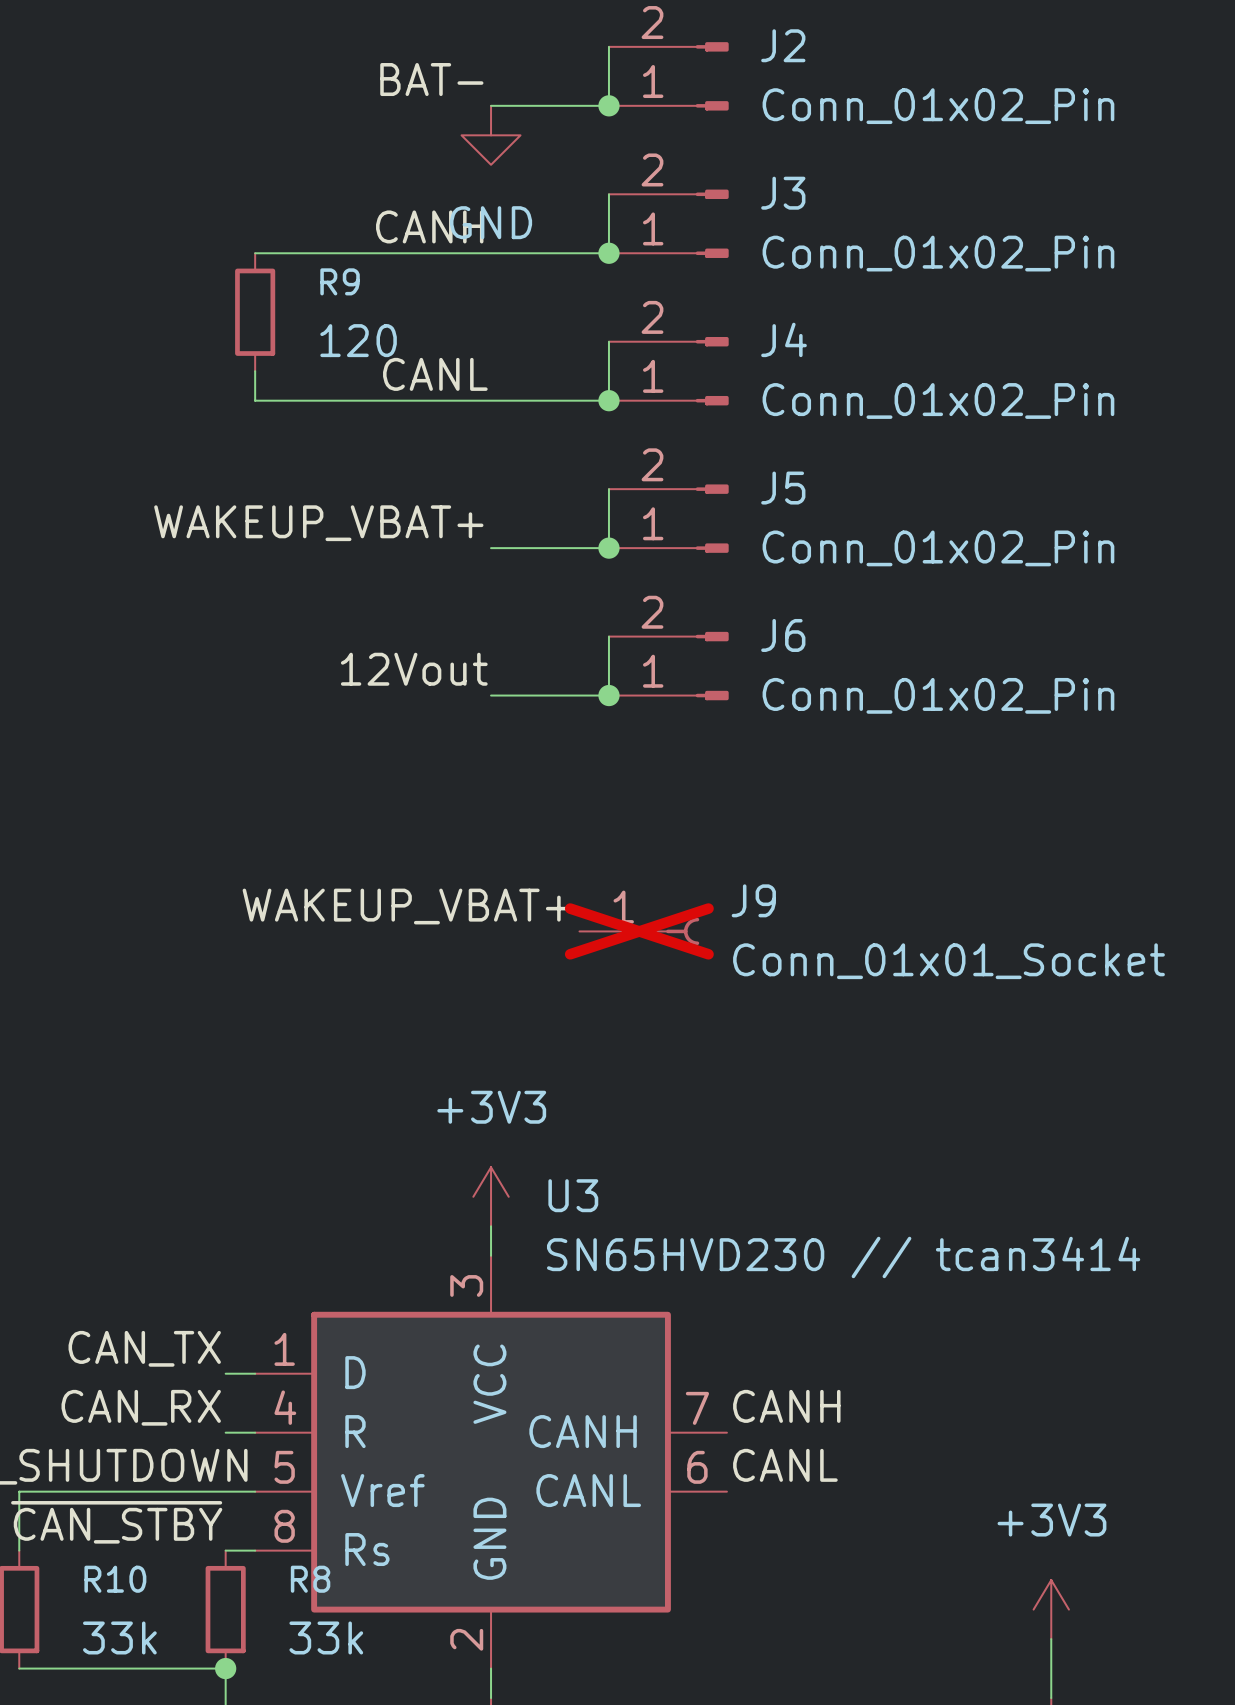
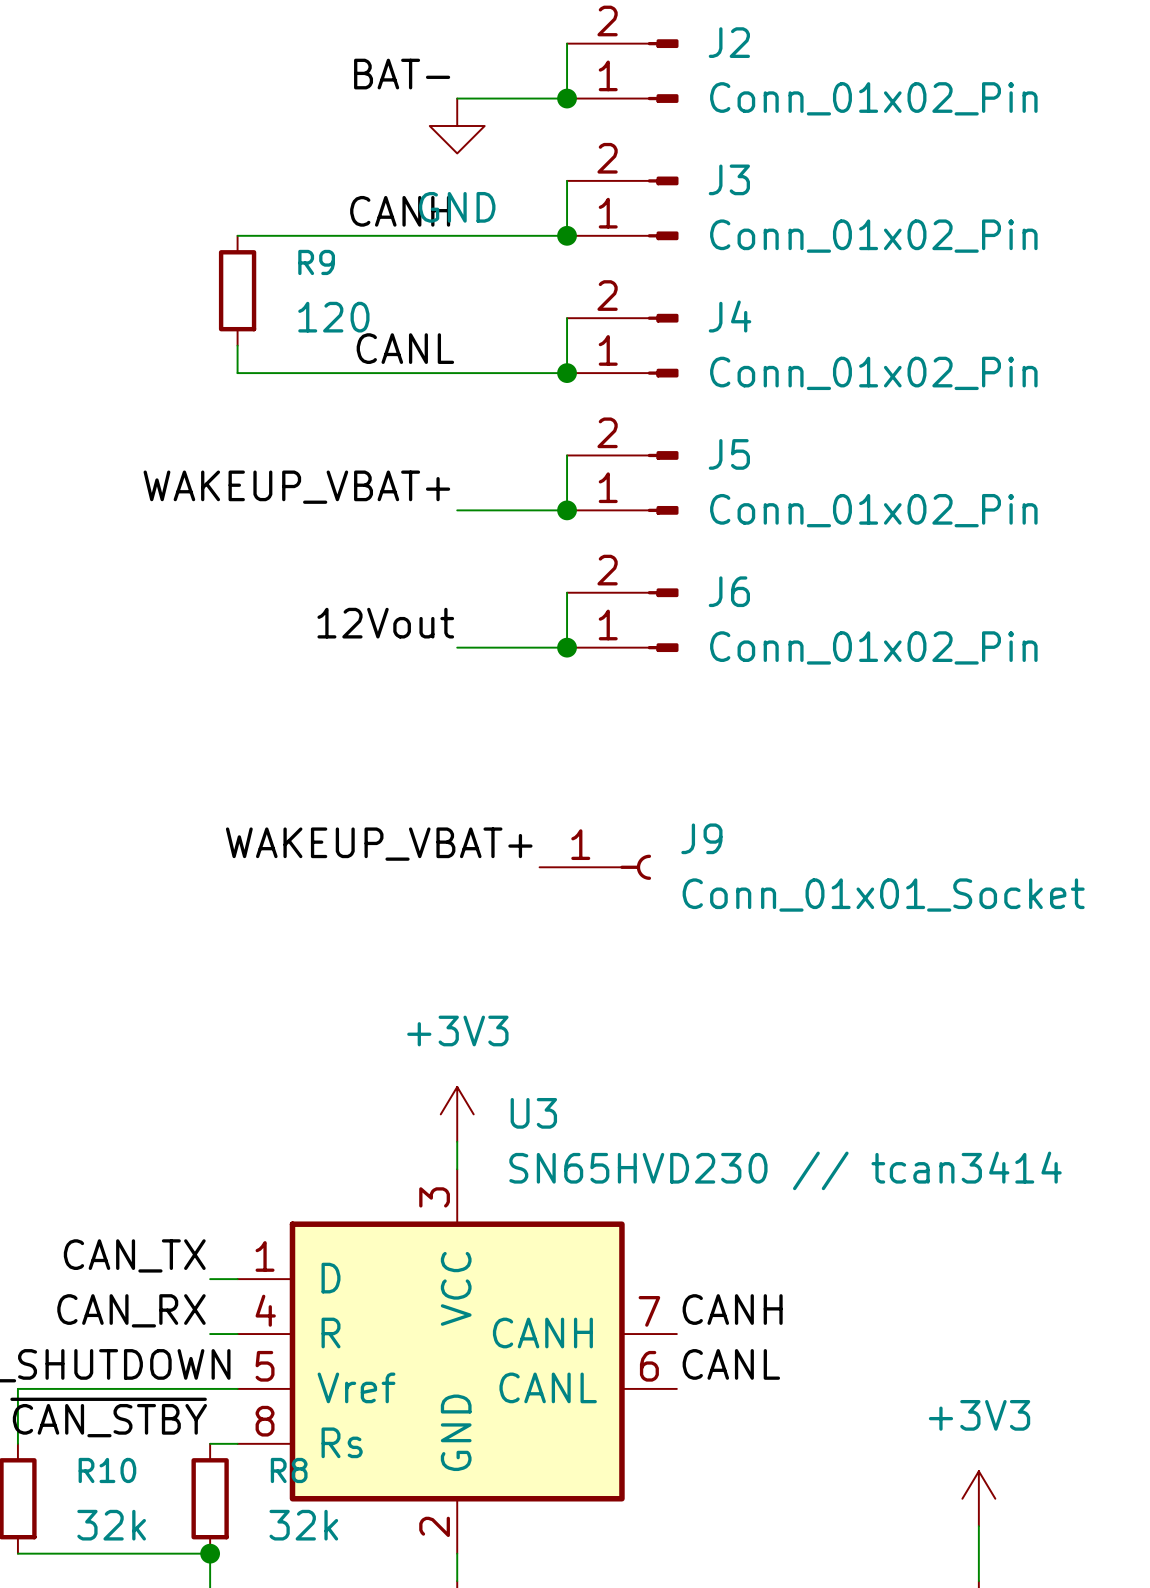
J9 do-not-place cross: (639, 931) -> none
R10 value: 33k (119, 1637) -> 32k (111, 1525)
R8 value: 33k (326, 1637) -> 32k (303, 1525)

